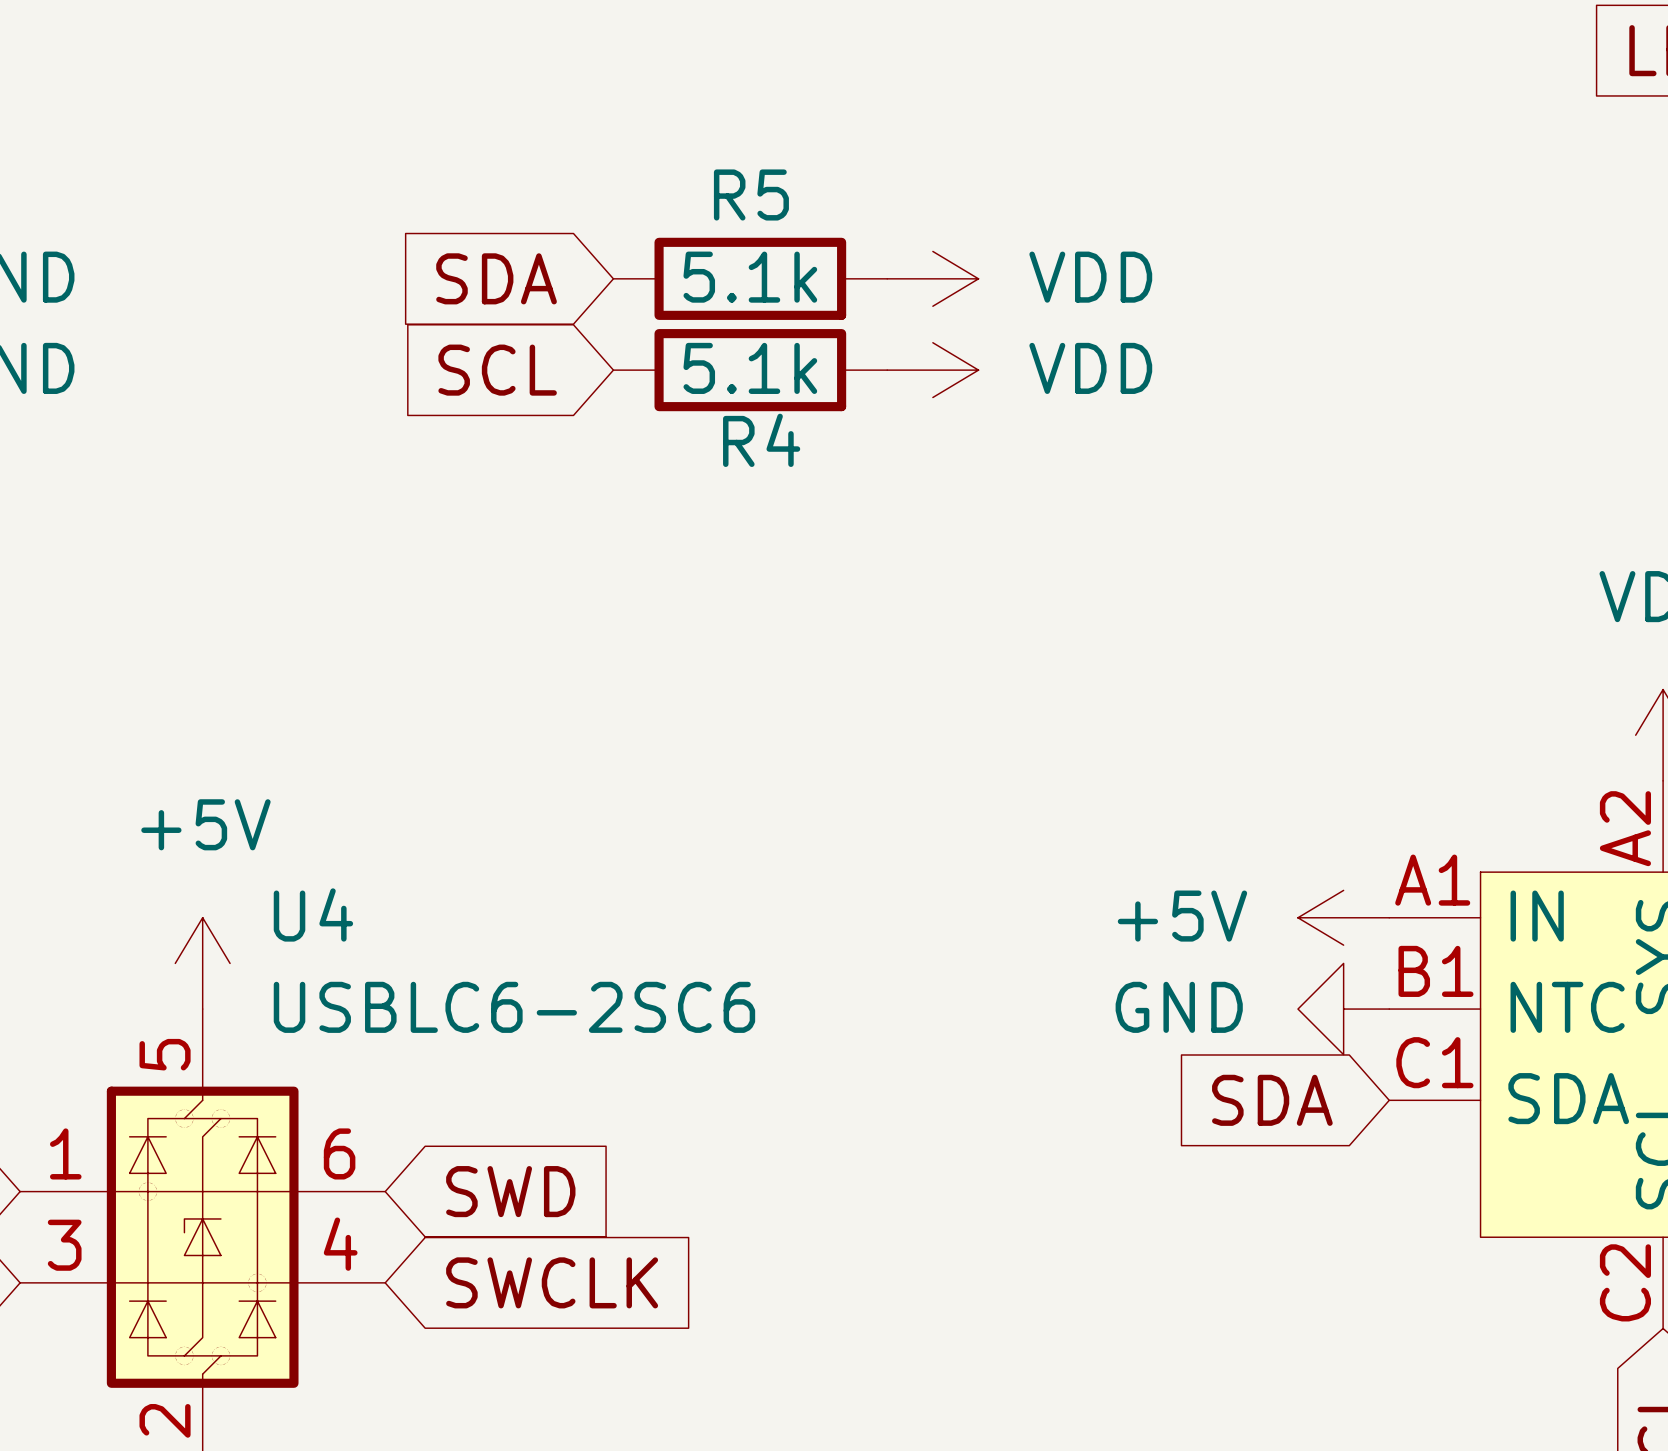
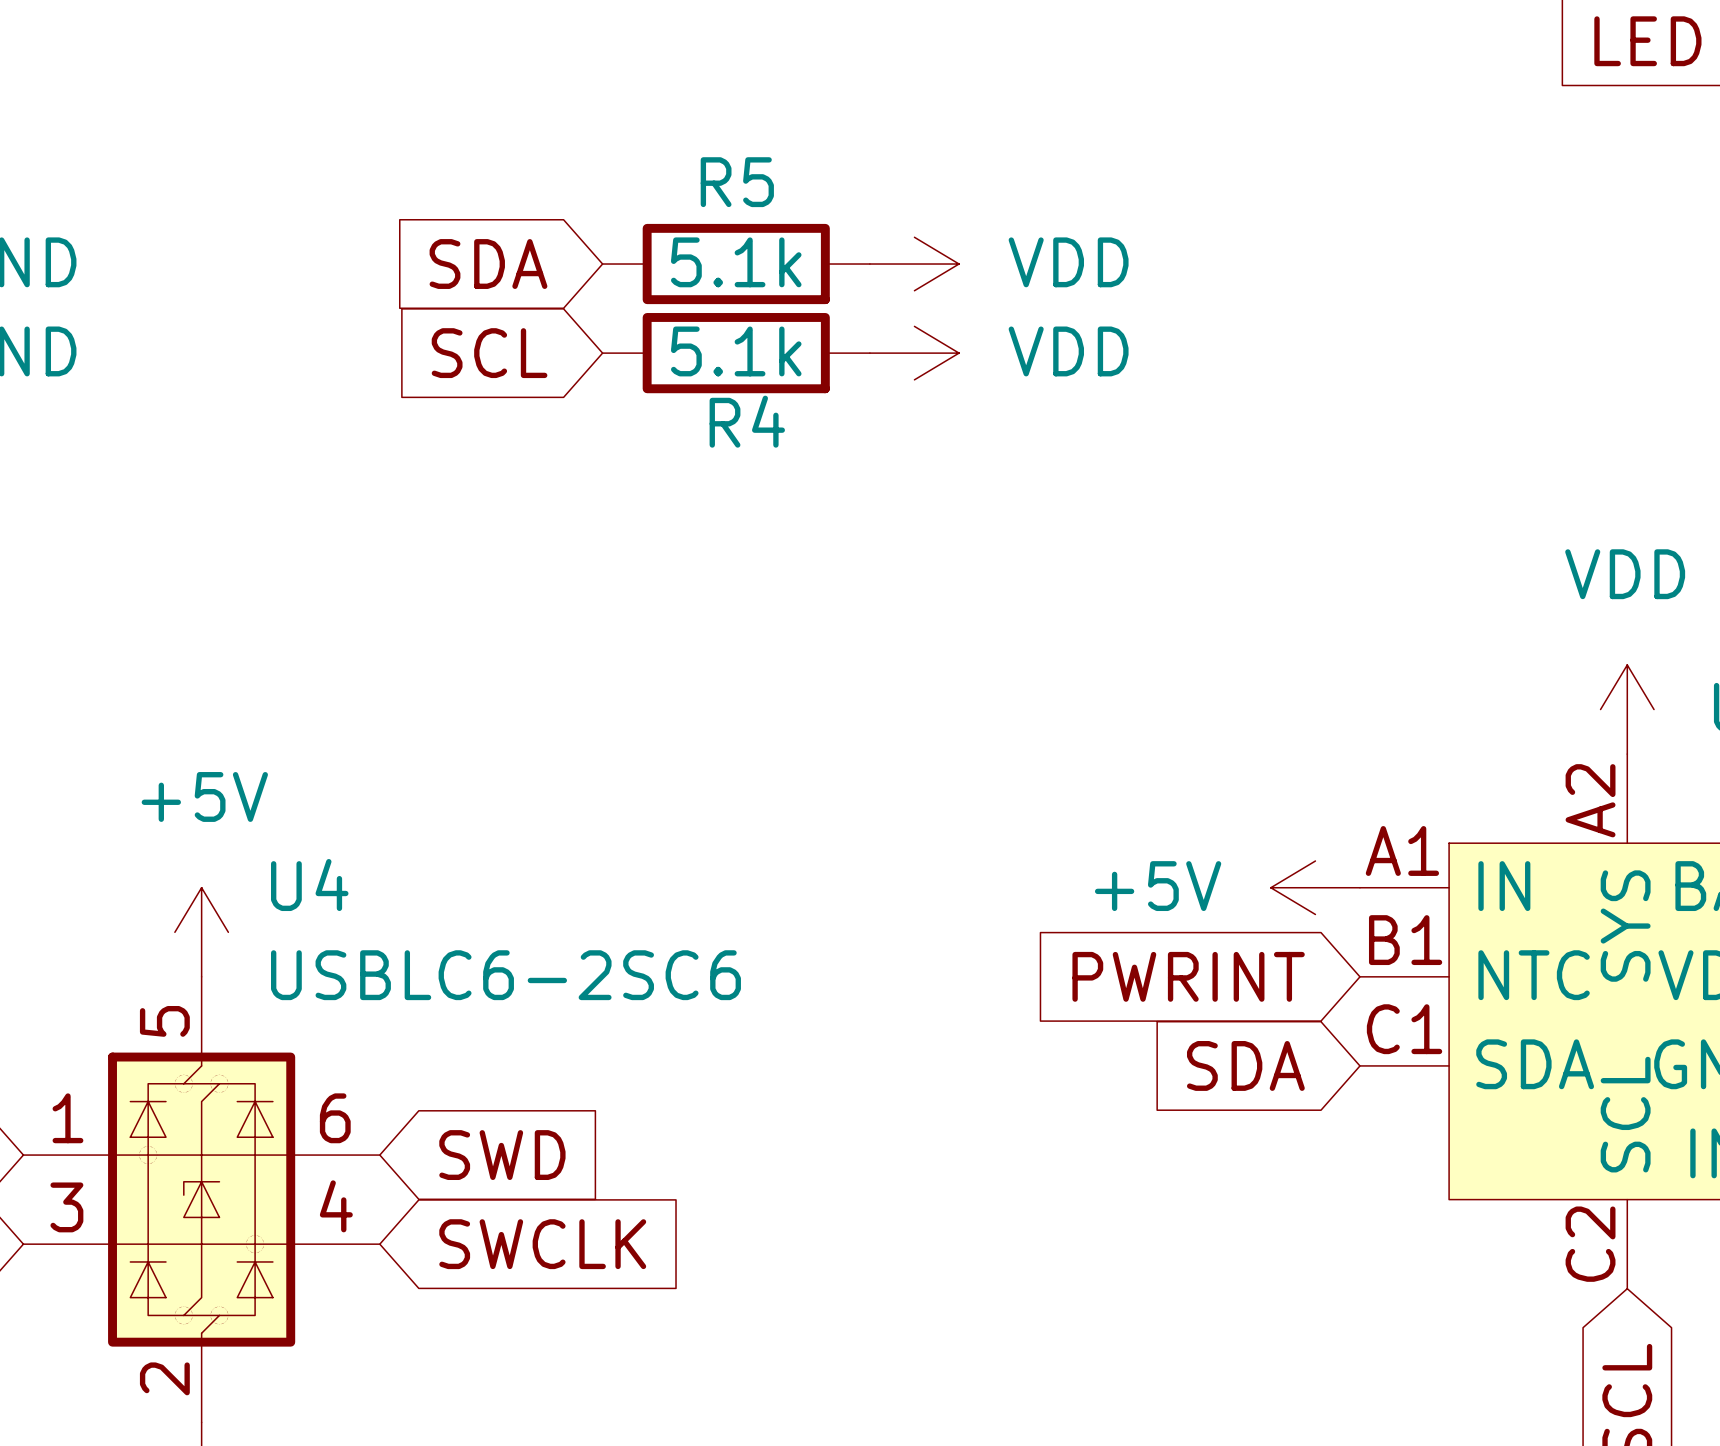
global label: none -> PWRINT (1188, 976)
power symbol: GND (1343, 1009) -> none

